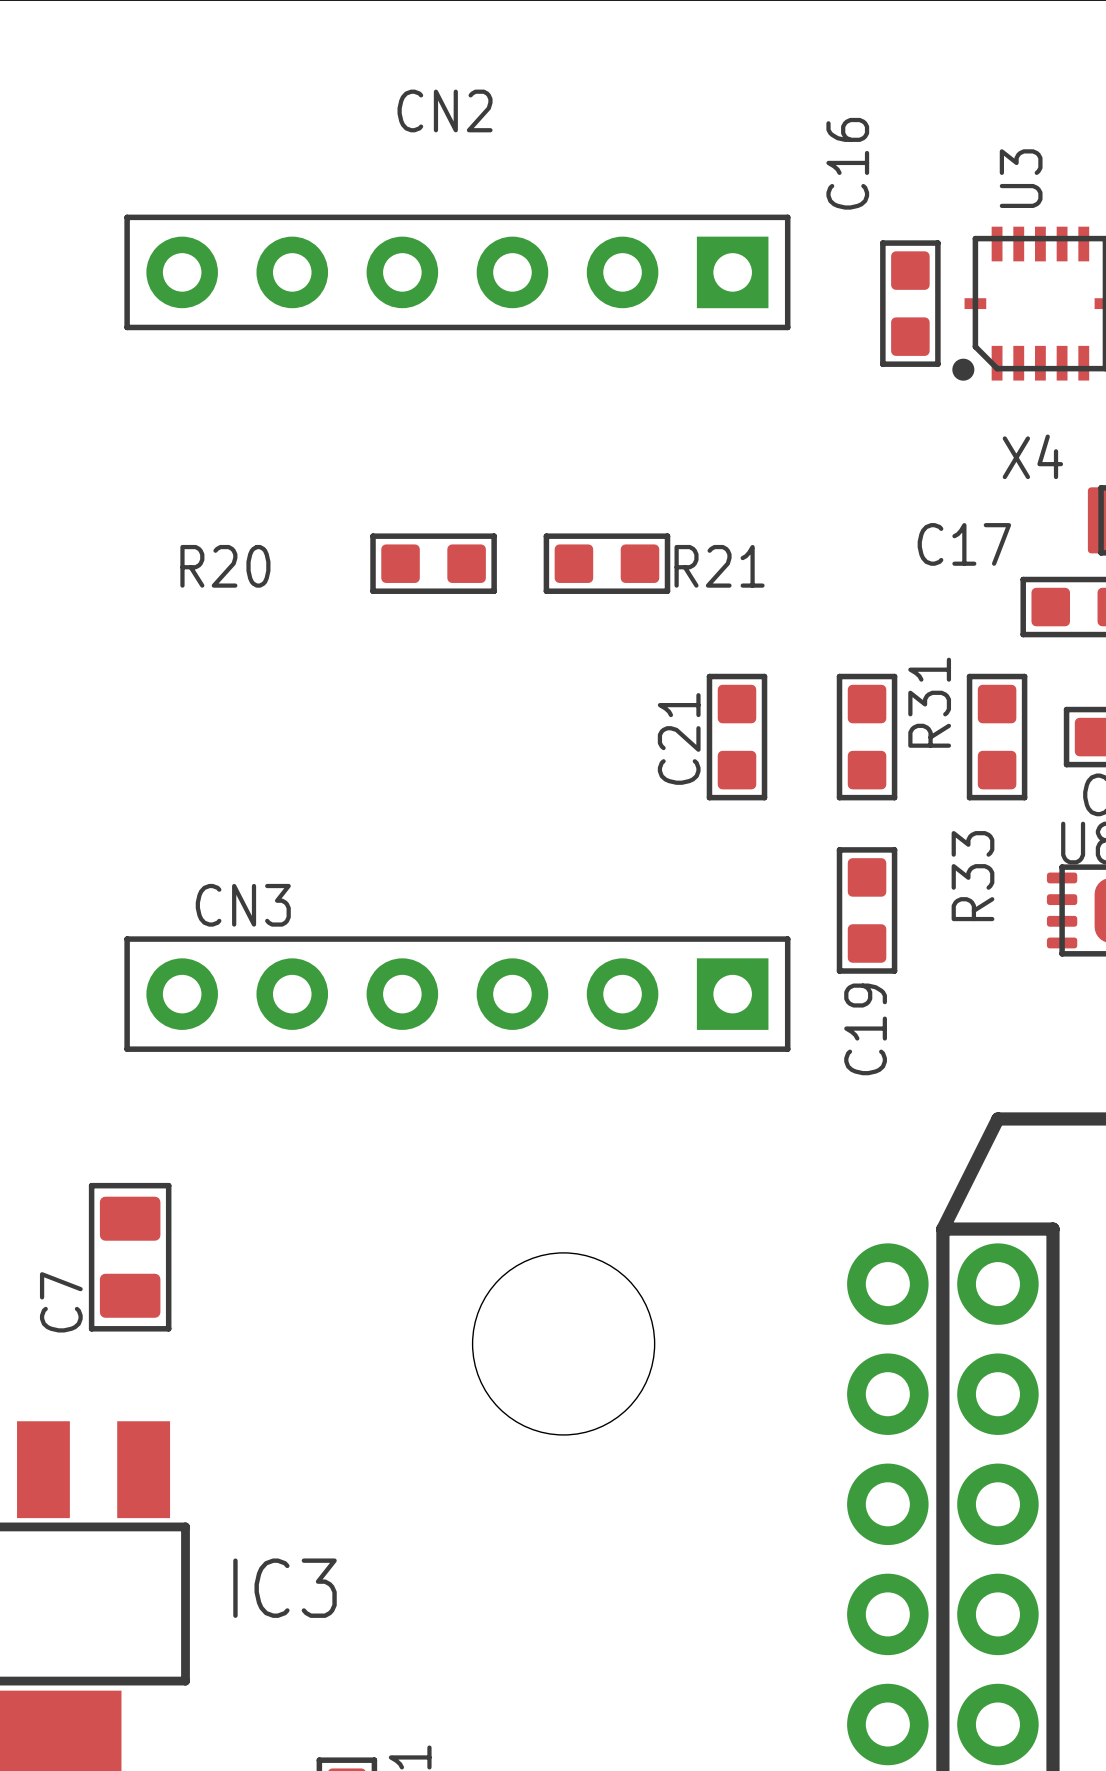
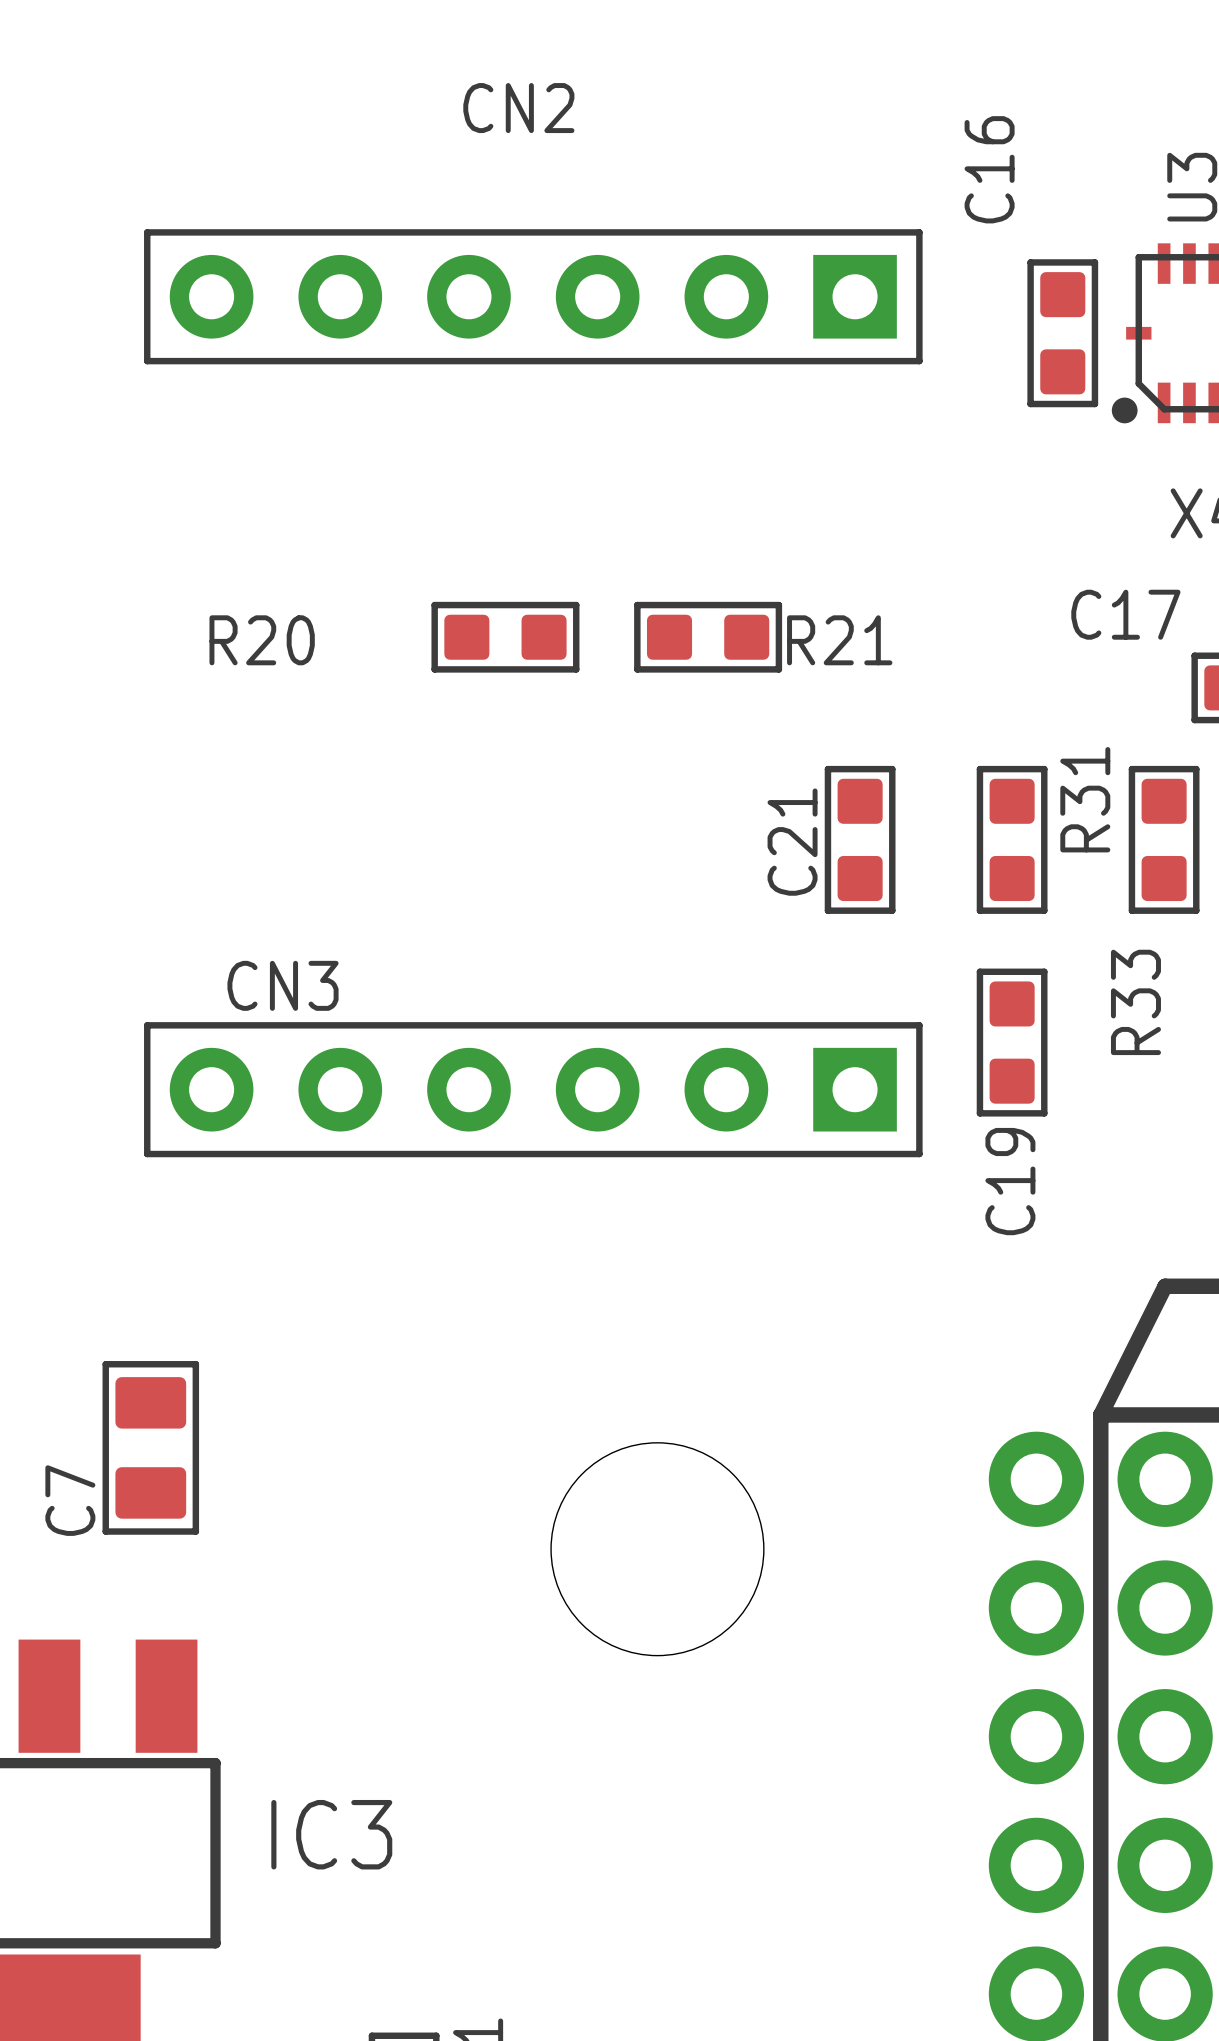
CN3 position: (457, 994) -> (533, 1089)

